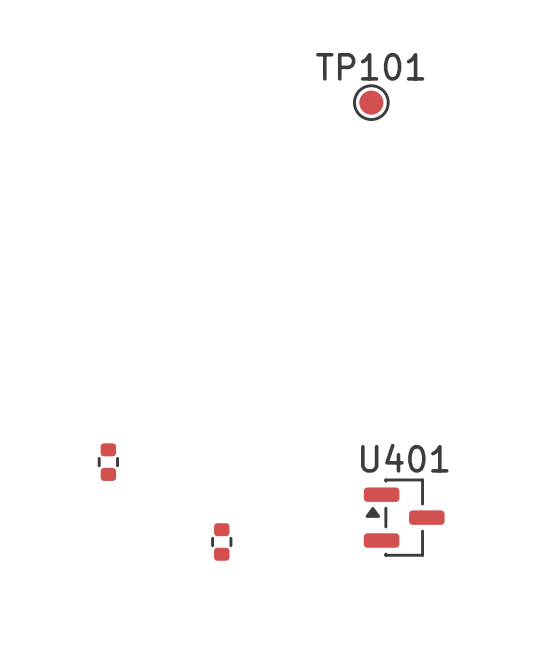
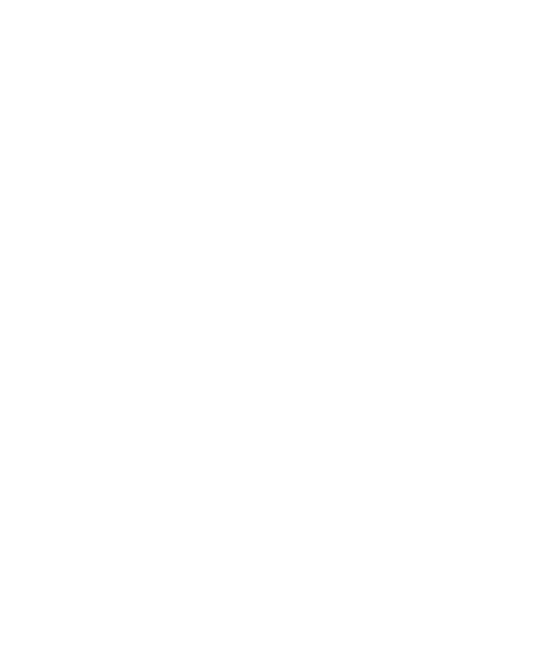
TP101: (371, 102) -> none
part: (108, 462) -> none
U401: (404, 517) -> none
part: (221, 541) -> none

